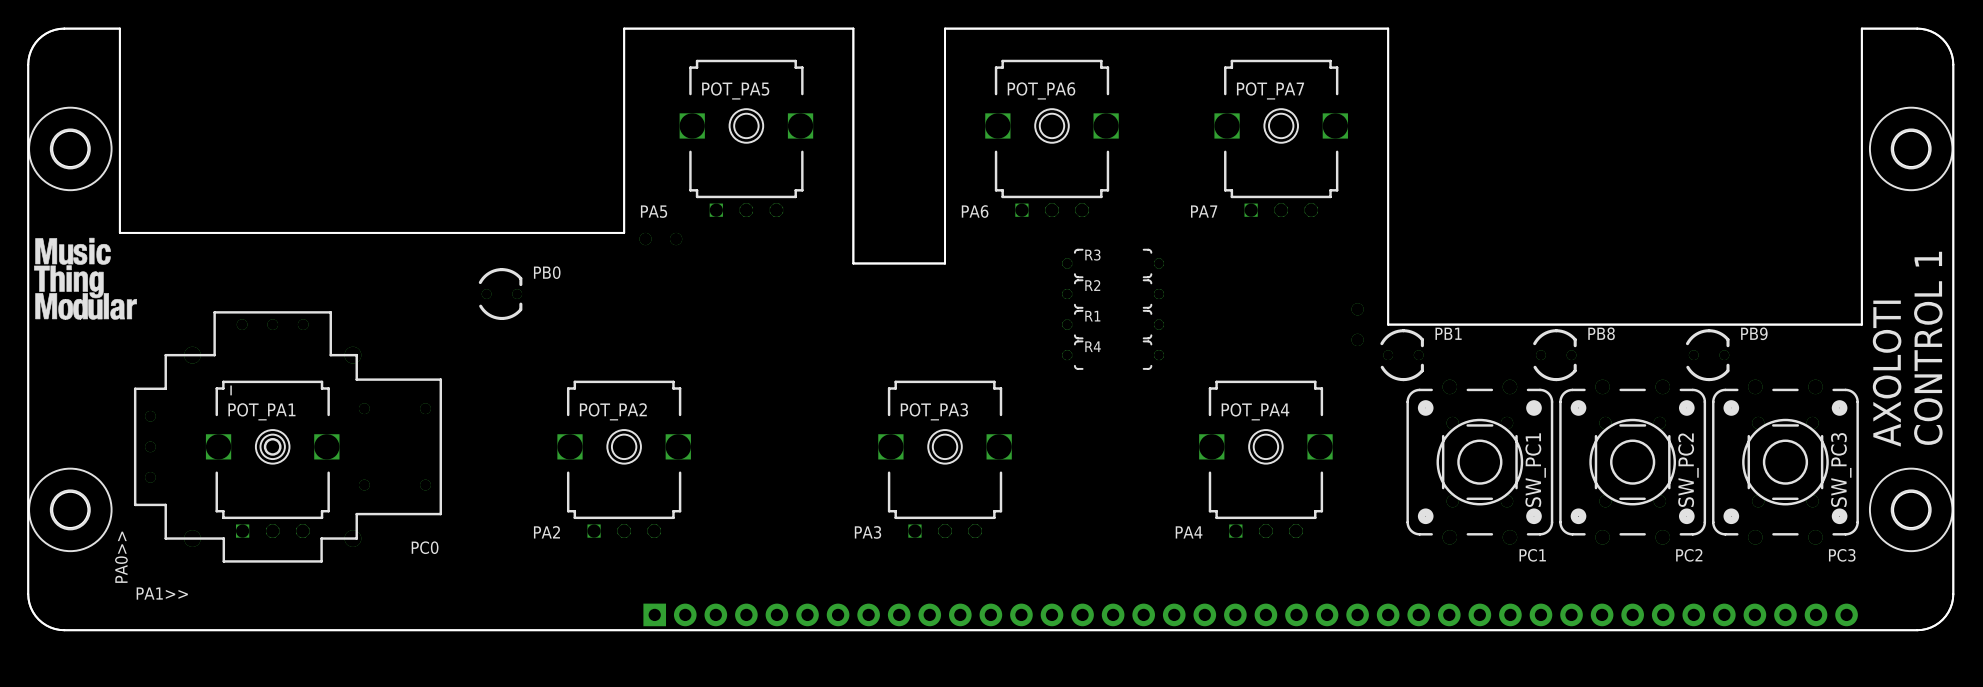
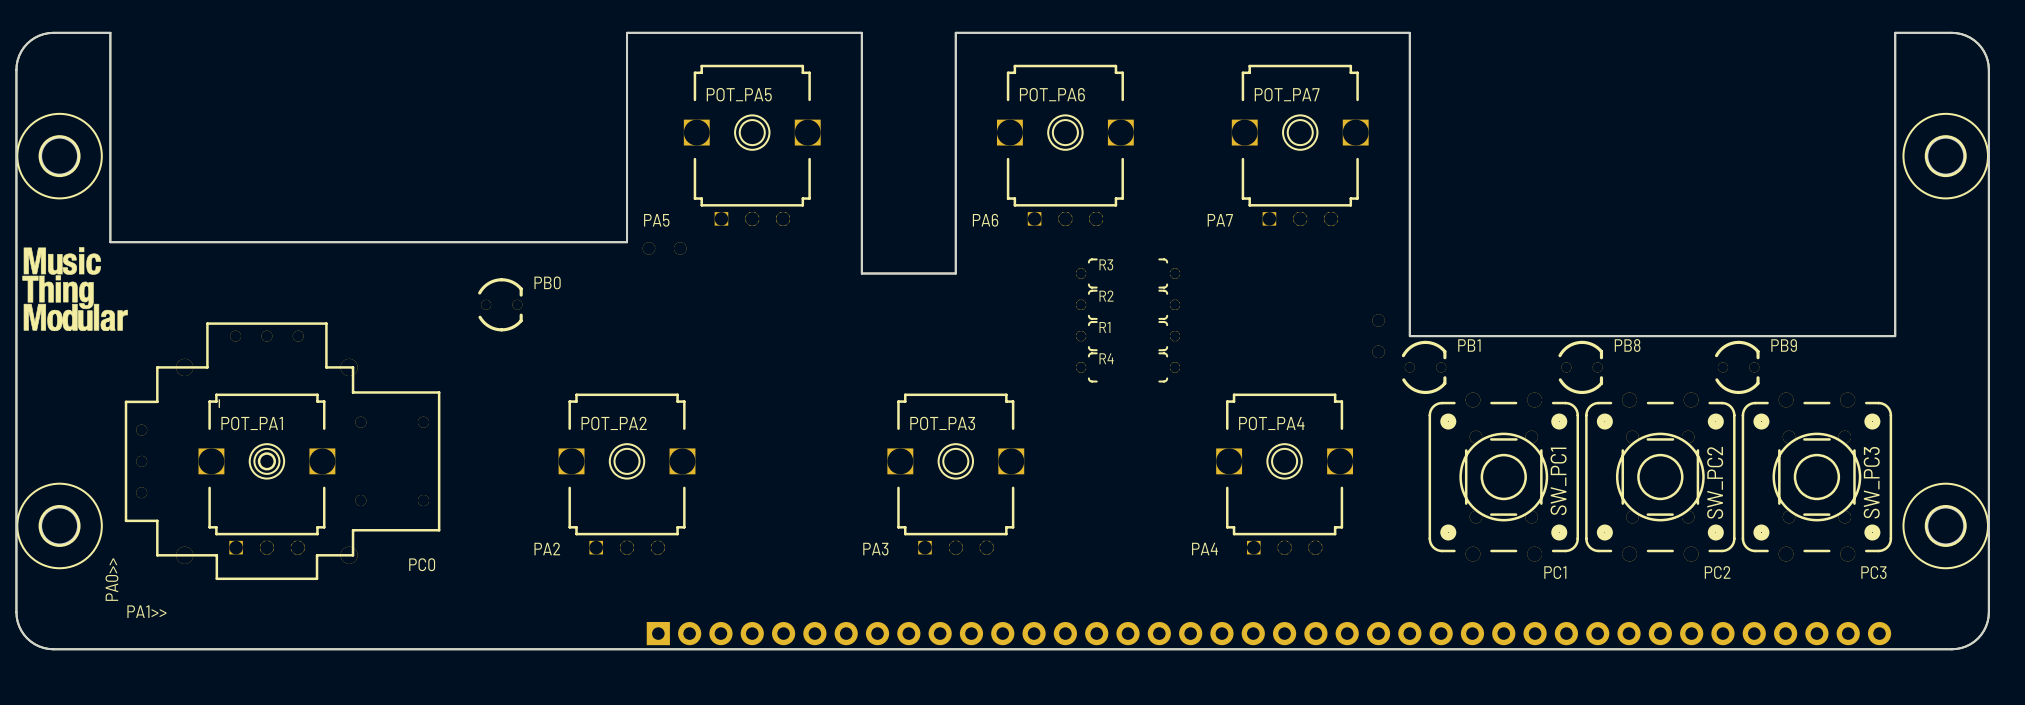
text: CONTROL 1 (1928, 348) -> none
text: AXOLOTI (1887, 373) -> none

